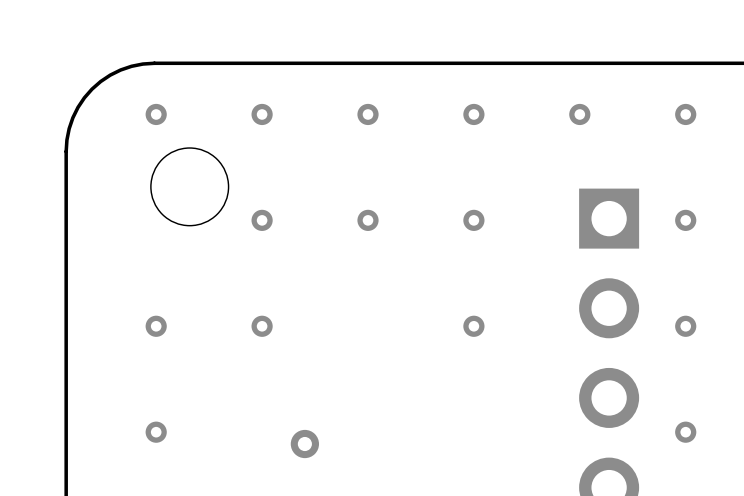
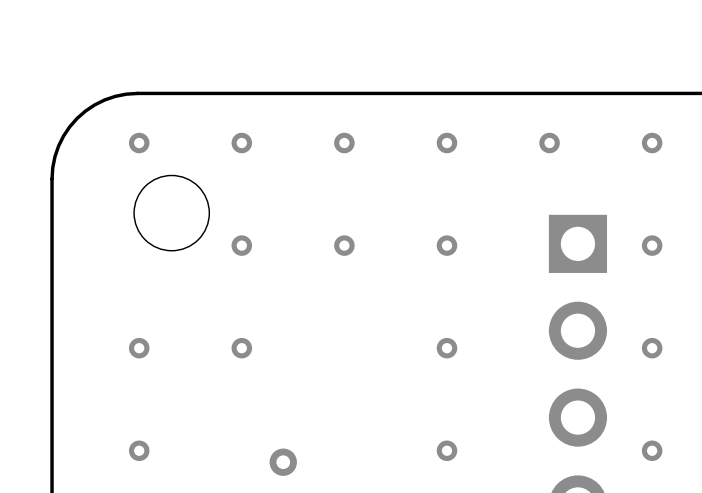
via: none -> (446, 450)

